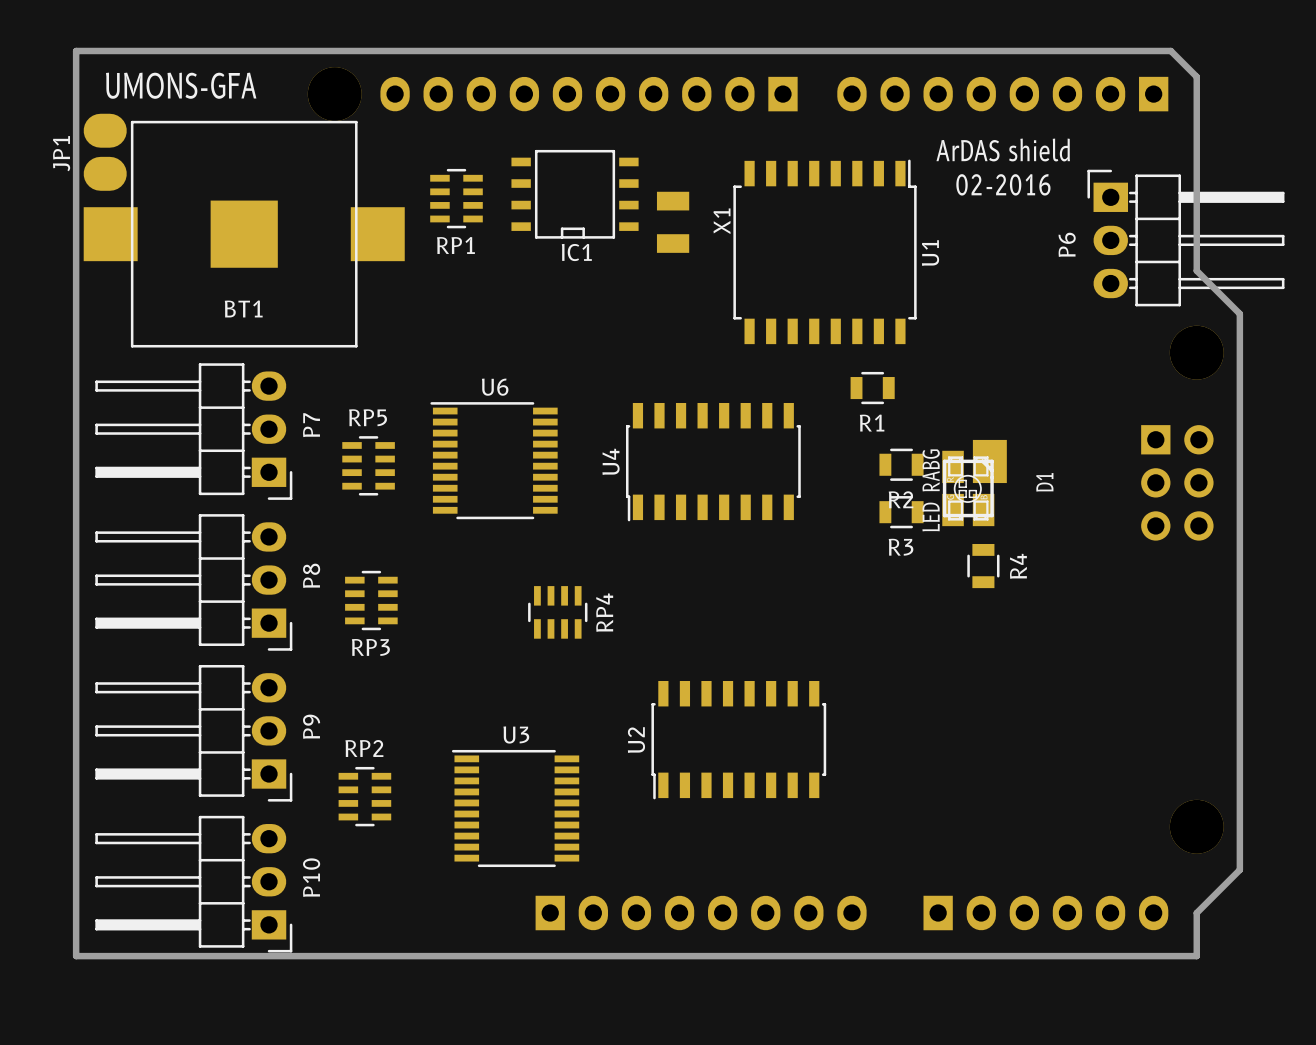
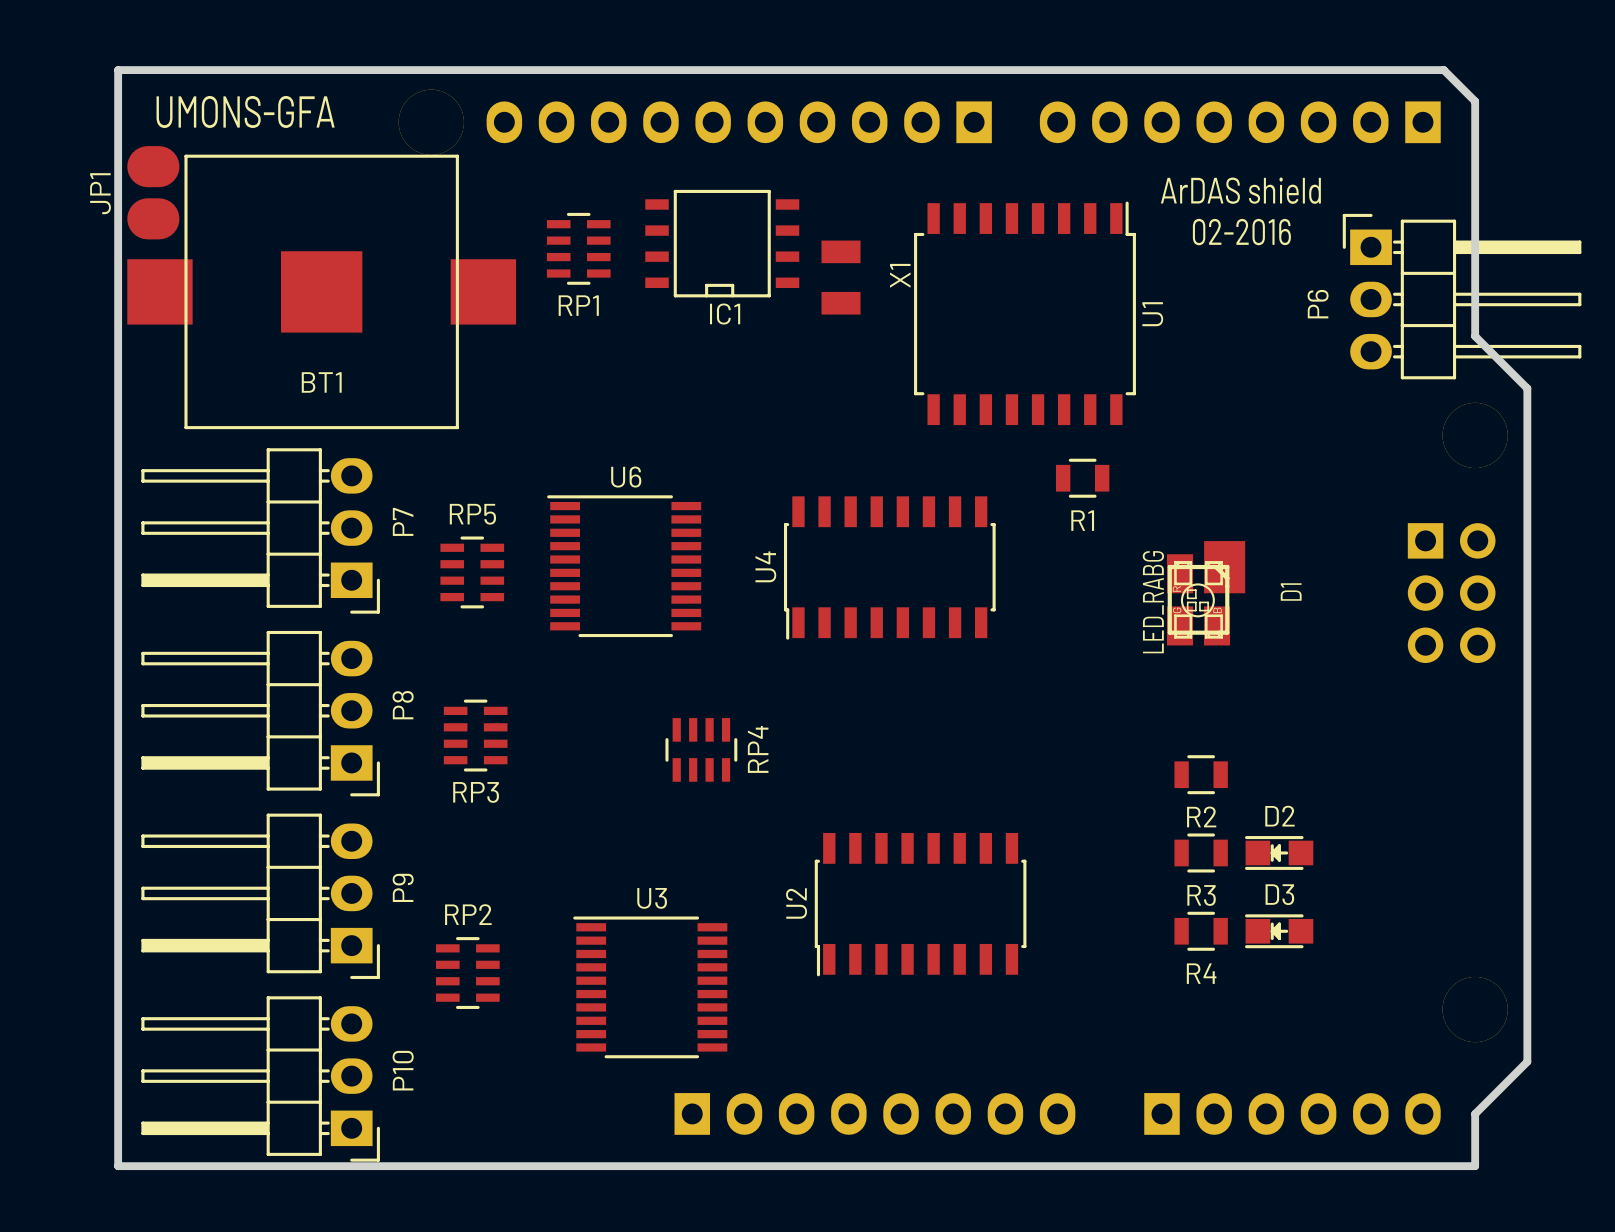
R2 position: (901, 464) -> (1201, 774)
R3 position: (901, 512) -> (1201, 852)
R4 rotation: 0° (983, 566) -> 90° clockwise (1201, 931)
R4 position: (983, 566) -> (1201, 931)
D2: none -> (1279, 852)
D3: none -> (1279, 931)

